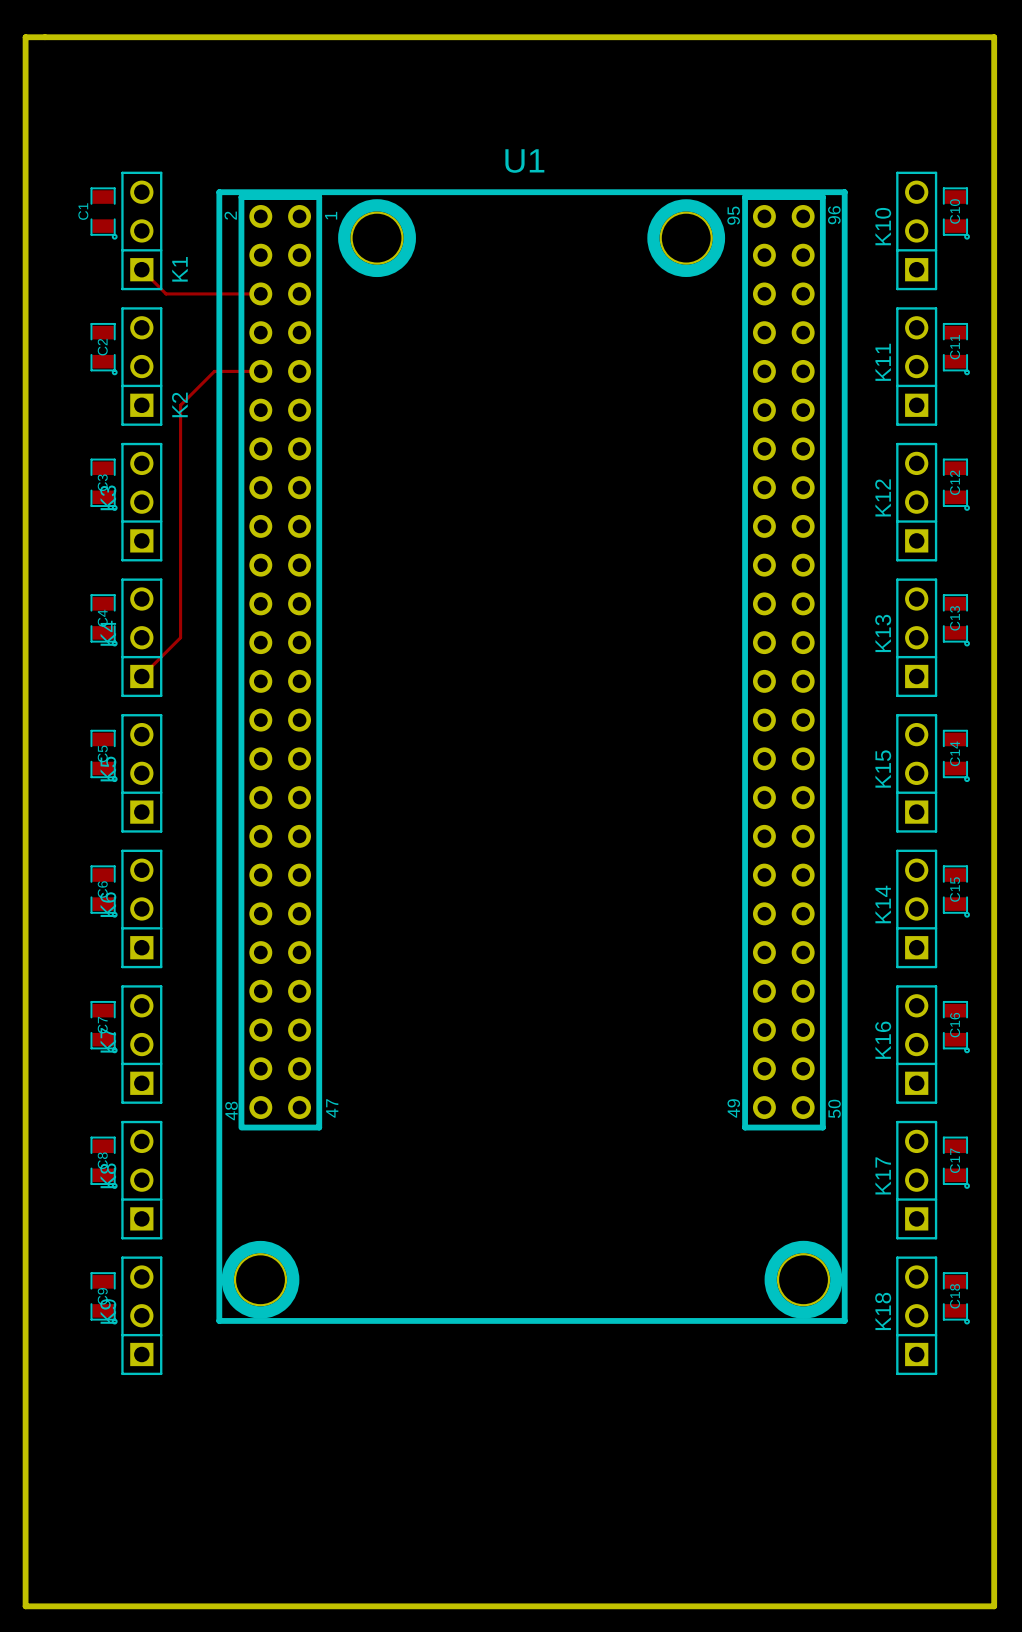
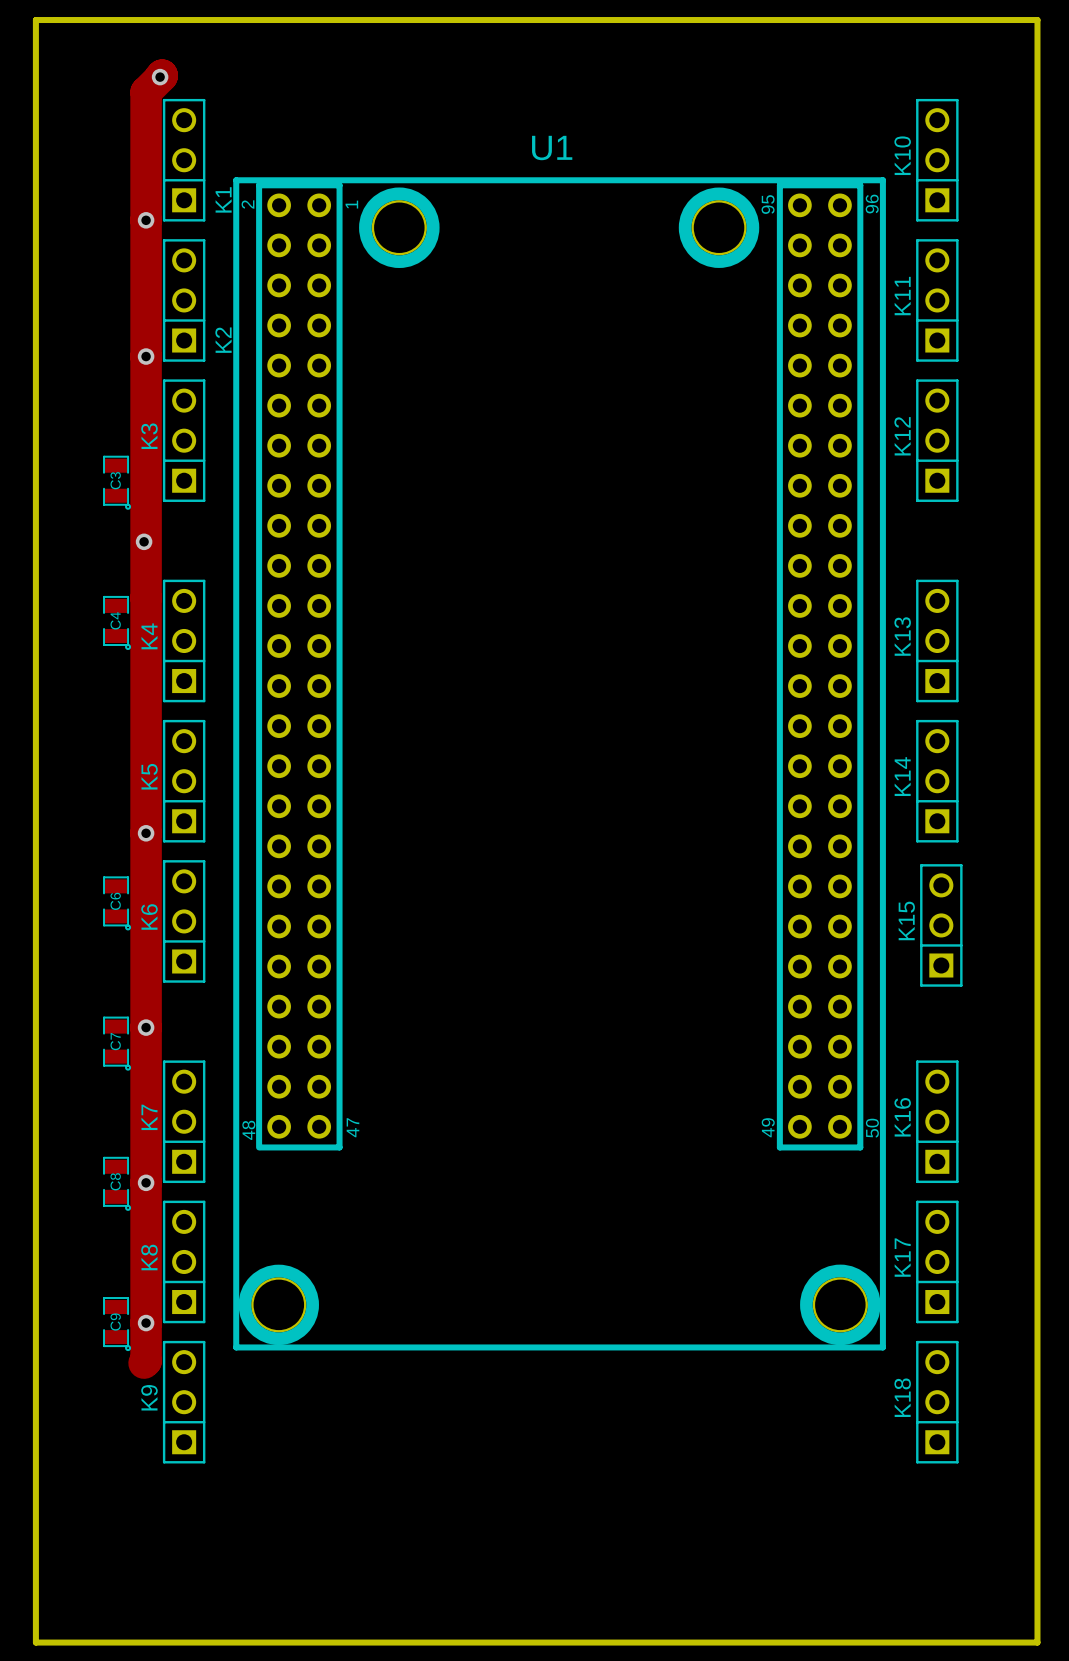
track: none -> (160, 77) (162, 75) (146, 92) (146, 1361) (144, 1363)
via: none -> (160, 77)
C1: (104, 213) -> none
C10: (956, 213) -> none
via: none -> (146, 220)
K1 position: (141, 230) -> (184, 160)
K10 position: (916, 230) -> (937, 160)
track: (141, 269) (166, 293) (260, 293) -> none
C2: (104, 349) -> none
C11: (956, 349) -> none
via: none -> (146, 356)
K2 position: (141, 366) -> (184, 300)
K11 position: (916, 366) -> (937, 300)
track: (260, 371) (214, 371) (180, 405) (180, 637) (141, 676) -> none
C12: (956, 484) -> none
K3 position: (141, 502) -> (184, 440)
K12 position: (916, 502) -> (937, 440)
via: none -> (144, 541)
C13: (956, 620) -> none
K4 position: (141, 637) -> (184, 640)
K13 position: (916, 637) -> (937, 640)
C5: (104, 755) -> none
C14: (956, 755) -> none
K5 position: (141, 773) -> (184, 781)
K15 position: (916, 773) -> (941, 925)
via: none -> (146, 833)
C15: (956, 891) -> none
K6 position: (141, 908) -> (184, 921)
K14 position: (916, 908) -> (937, 781)
via: none -> (146, 1027)
C16: (956, 1027) -> none
K7 position: (141, 1044) -> (184, 1121)
K16 position: (916, 1044) -> (937, 1121)
via: none -> (146, 1182)
C17: (956, 1162) -> none
K8 position: (141, 1180) -> (184, 1261)
K17 position: (916, 1180) -> (937, 1261)
via: none -> (146, 1323)
C18: (956, 1298) -> none
K9 position: (141, 1315) -> (184, 1402)
K18 position: (916, 1315) -> (937, 1402)

